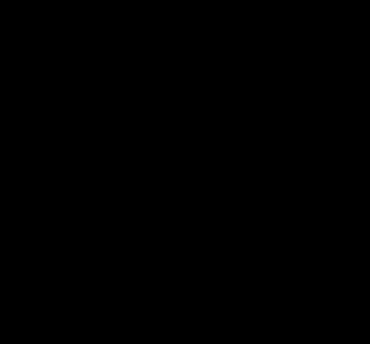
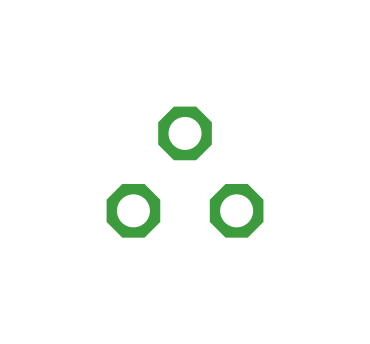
part: none -> (185, 172)

